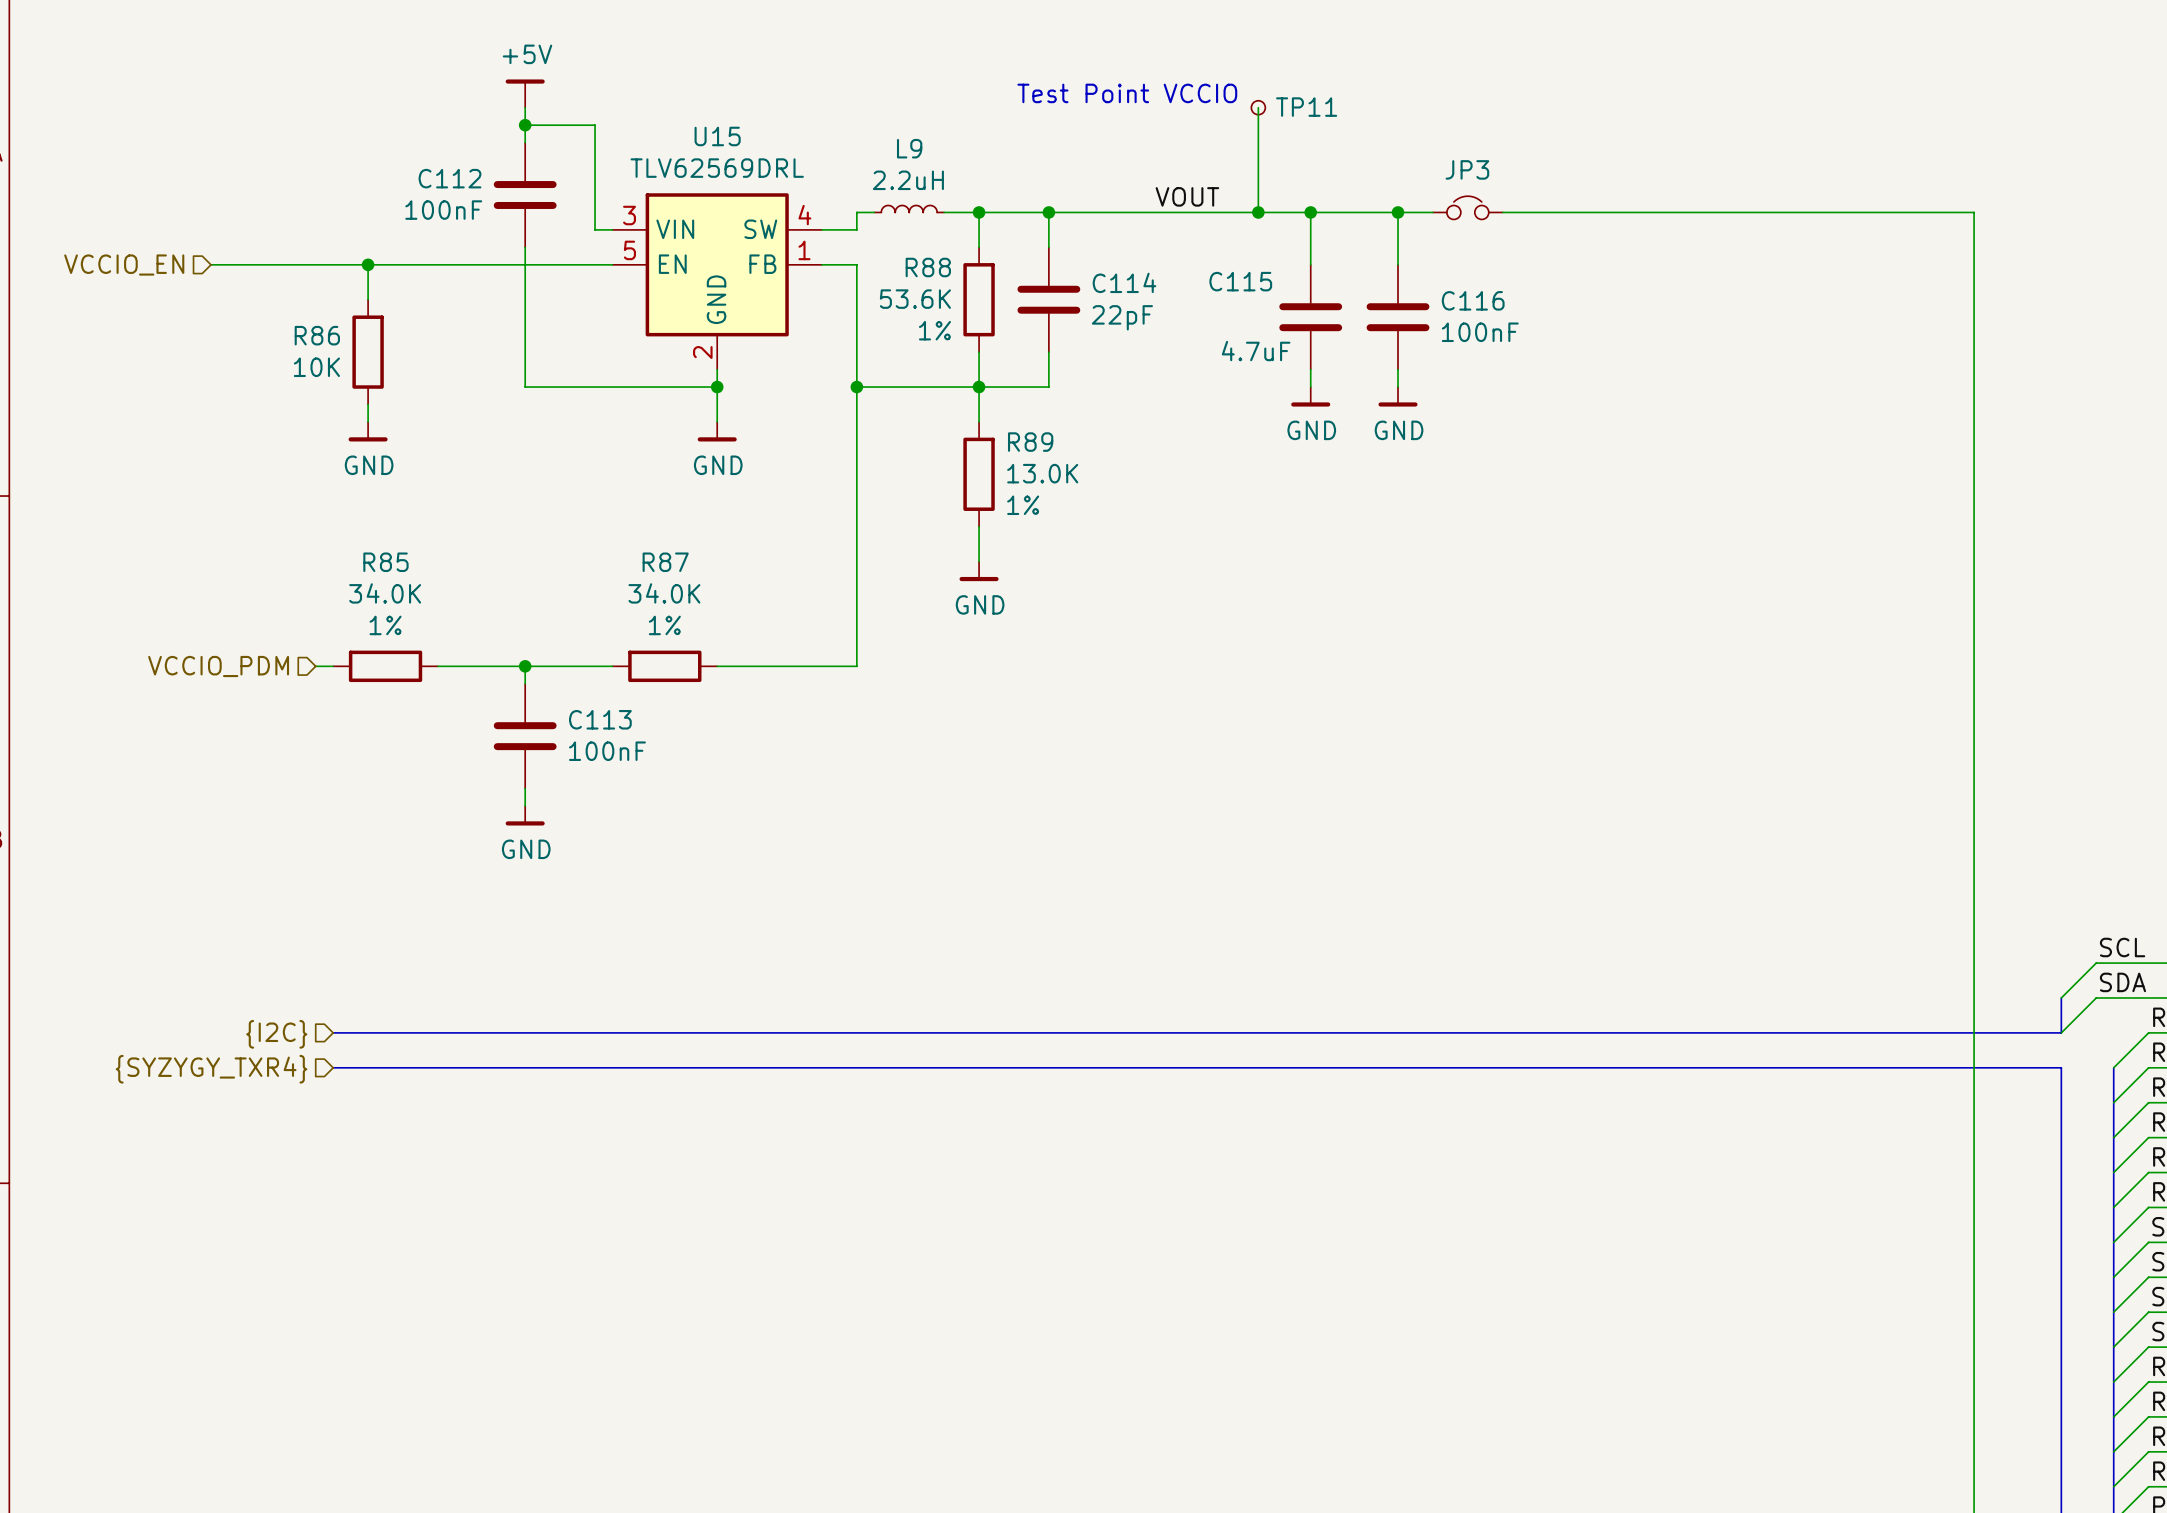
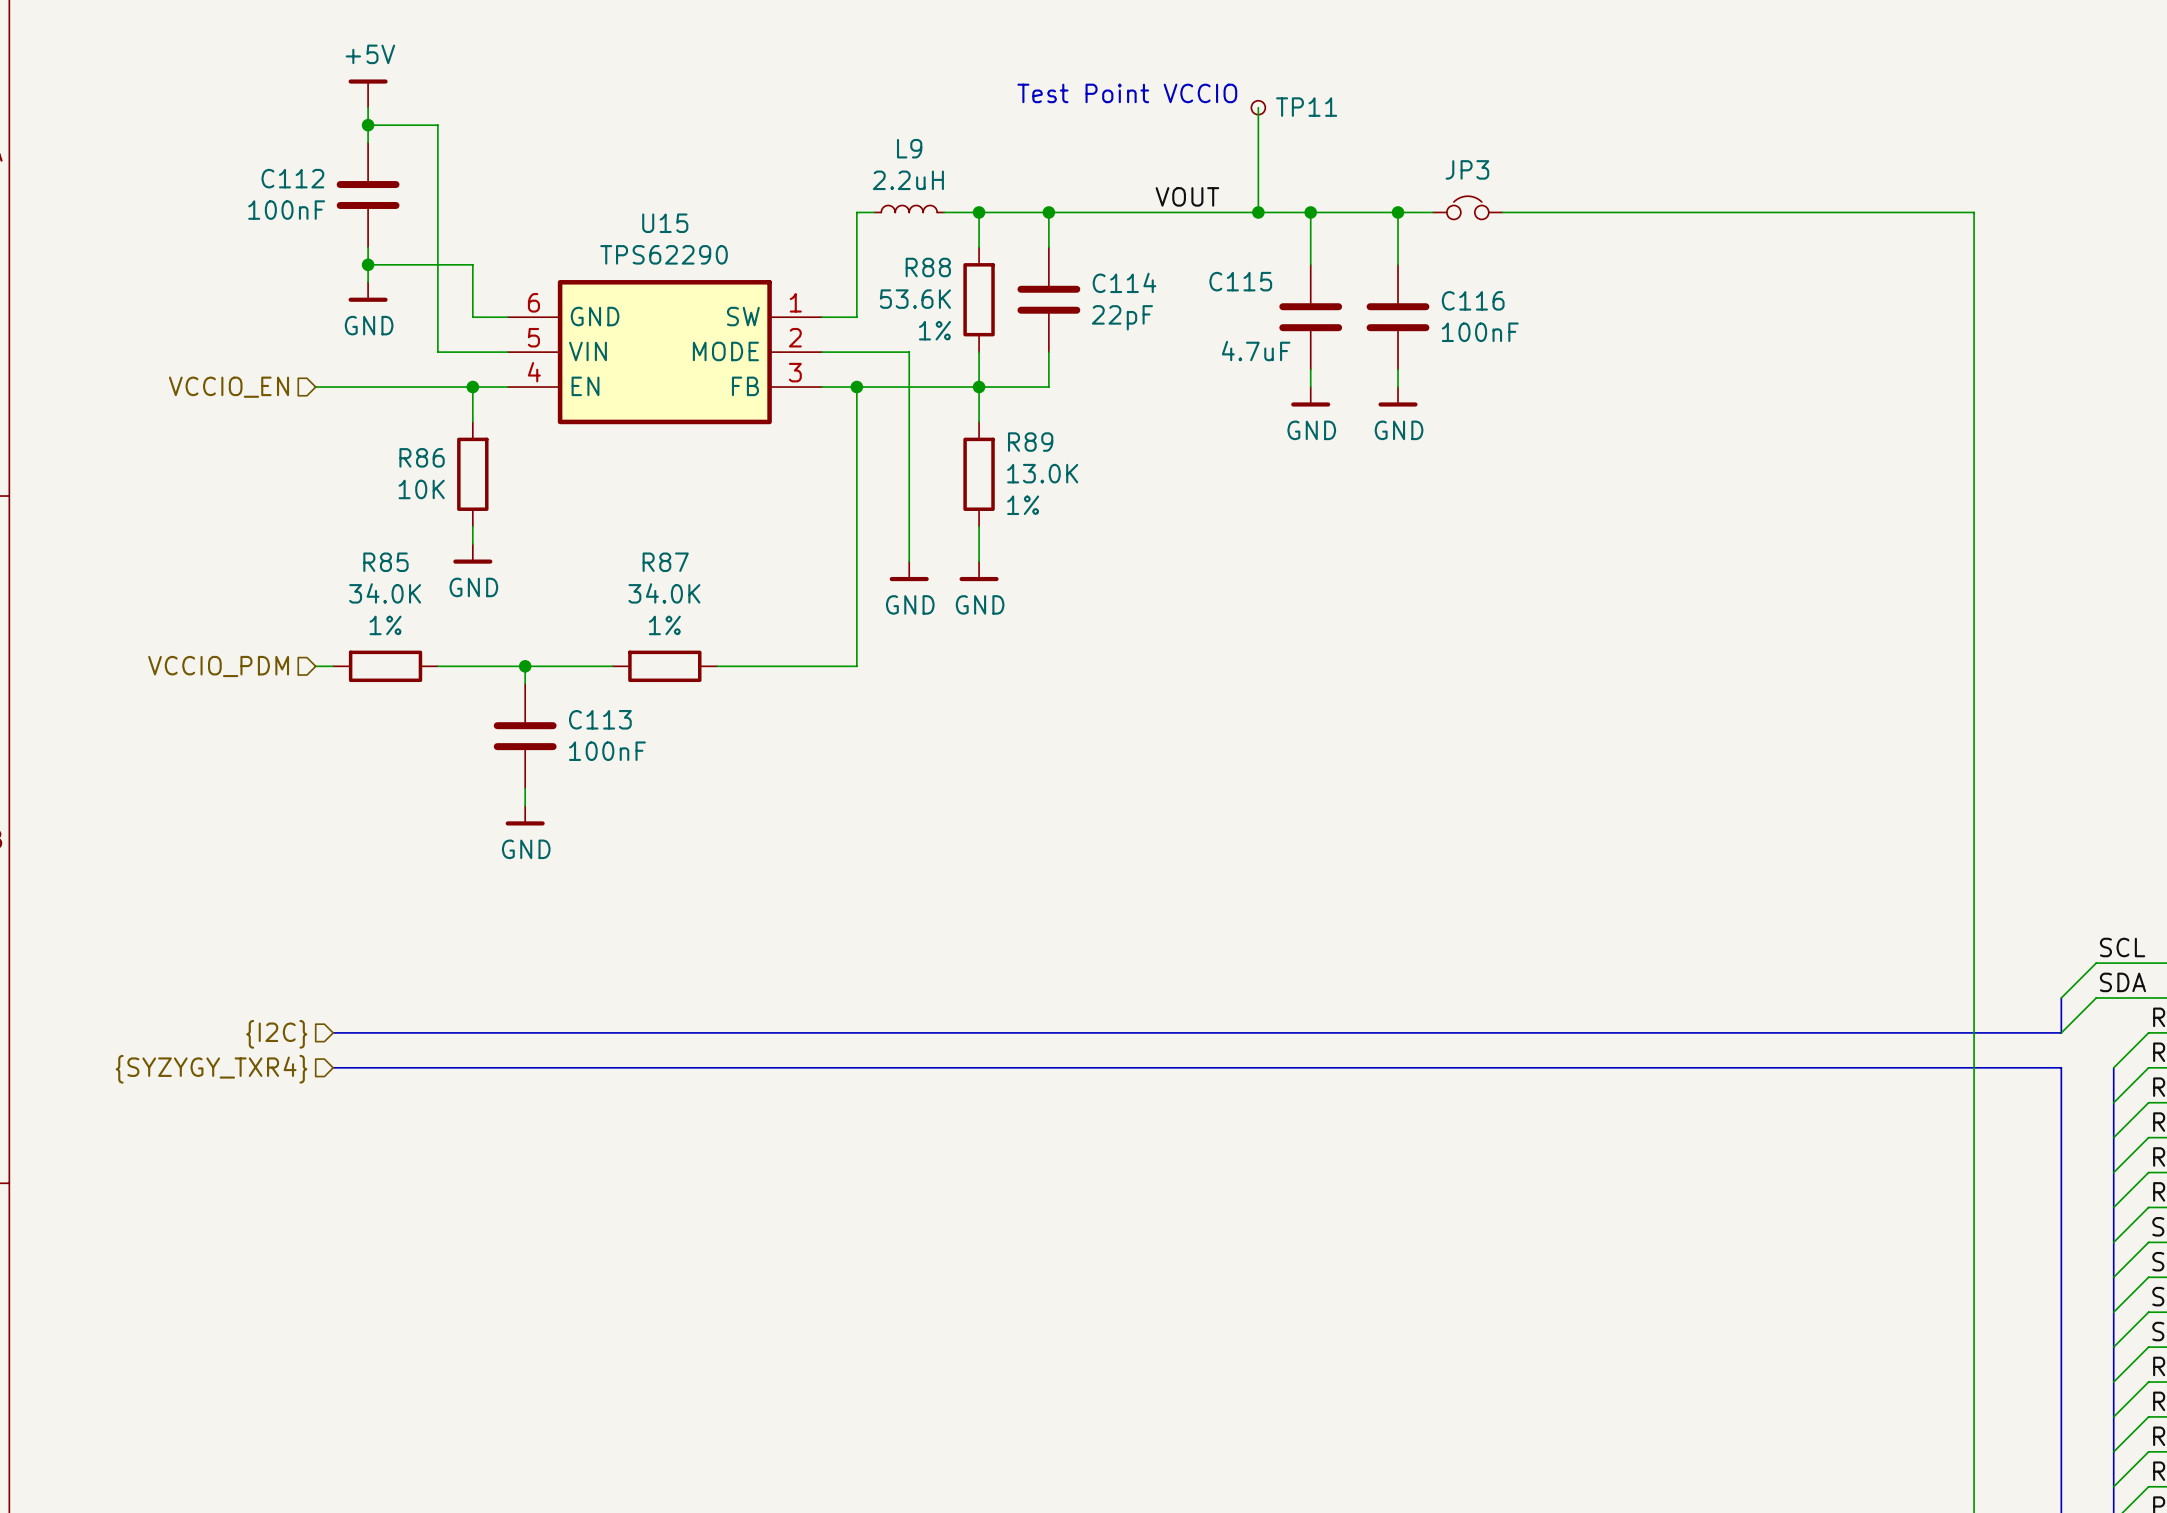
power symbol position: +5V (525, 93) -> +5V (368, 93)
wire: (525, 107) (525, 142) -> (368, 107) (368, 142)
wire: none -> (368, 125) (437, 125) (437, 352) (507, 352)
junction: none -> (368, 125)
wire: (525, 125) (595, 125) (595, 229) (612, 229) -> none
junction: (525, 125) -> none
U15 value: TLV62569DRL (717, 168) -> TPS62290 (664, 254)
U15 symbol: [612, 193, 822, 370] -> [507, 280, 822, 425]
C112 position: (525, 195) -> (368, 195)
wire: (821, 229) (856, 229) -> (856, 264) (856, 229)
wire: (525, 247) (525, 387) (717, 387) -> none
wire: (210, 264) (368, 264) -> (368, 247) (368, 264)
wire: (472, 264) (612, 264) -> (472, 264) (472, 317) (507, 317)
wire: (821, 264) (856, 264) -> (821, 387) (856, 387)
hierarchical label position: VCCIO_EN (124, 265) -> VCCIO_EN (228, 387)
power symbol: none -> GND (368, 292)
wire: (856, 317) (856, 387) -> (856, 317) (821, 317)
R86 position: (368, 352) -> (472, 474)
wire: none -> (821, 352) (909, 352) (909, 561)
wire: none -> (315, 387) (507, 387)
wire: none -> (472, 387) (472, 421)
junction: none -> (472, 387)
junction: (717, 387) -> none
wire: (368, 404) (368, 421) -> (472, 526) (472, 544)
power symbol: GND (368, 431) -> none
power symbol: GND (717, 431) -> none
power symbol: none -> GND (472, 553)
power symbol: none -> GND (909, 571)

